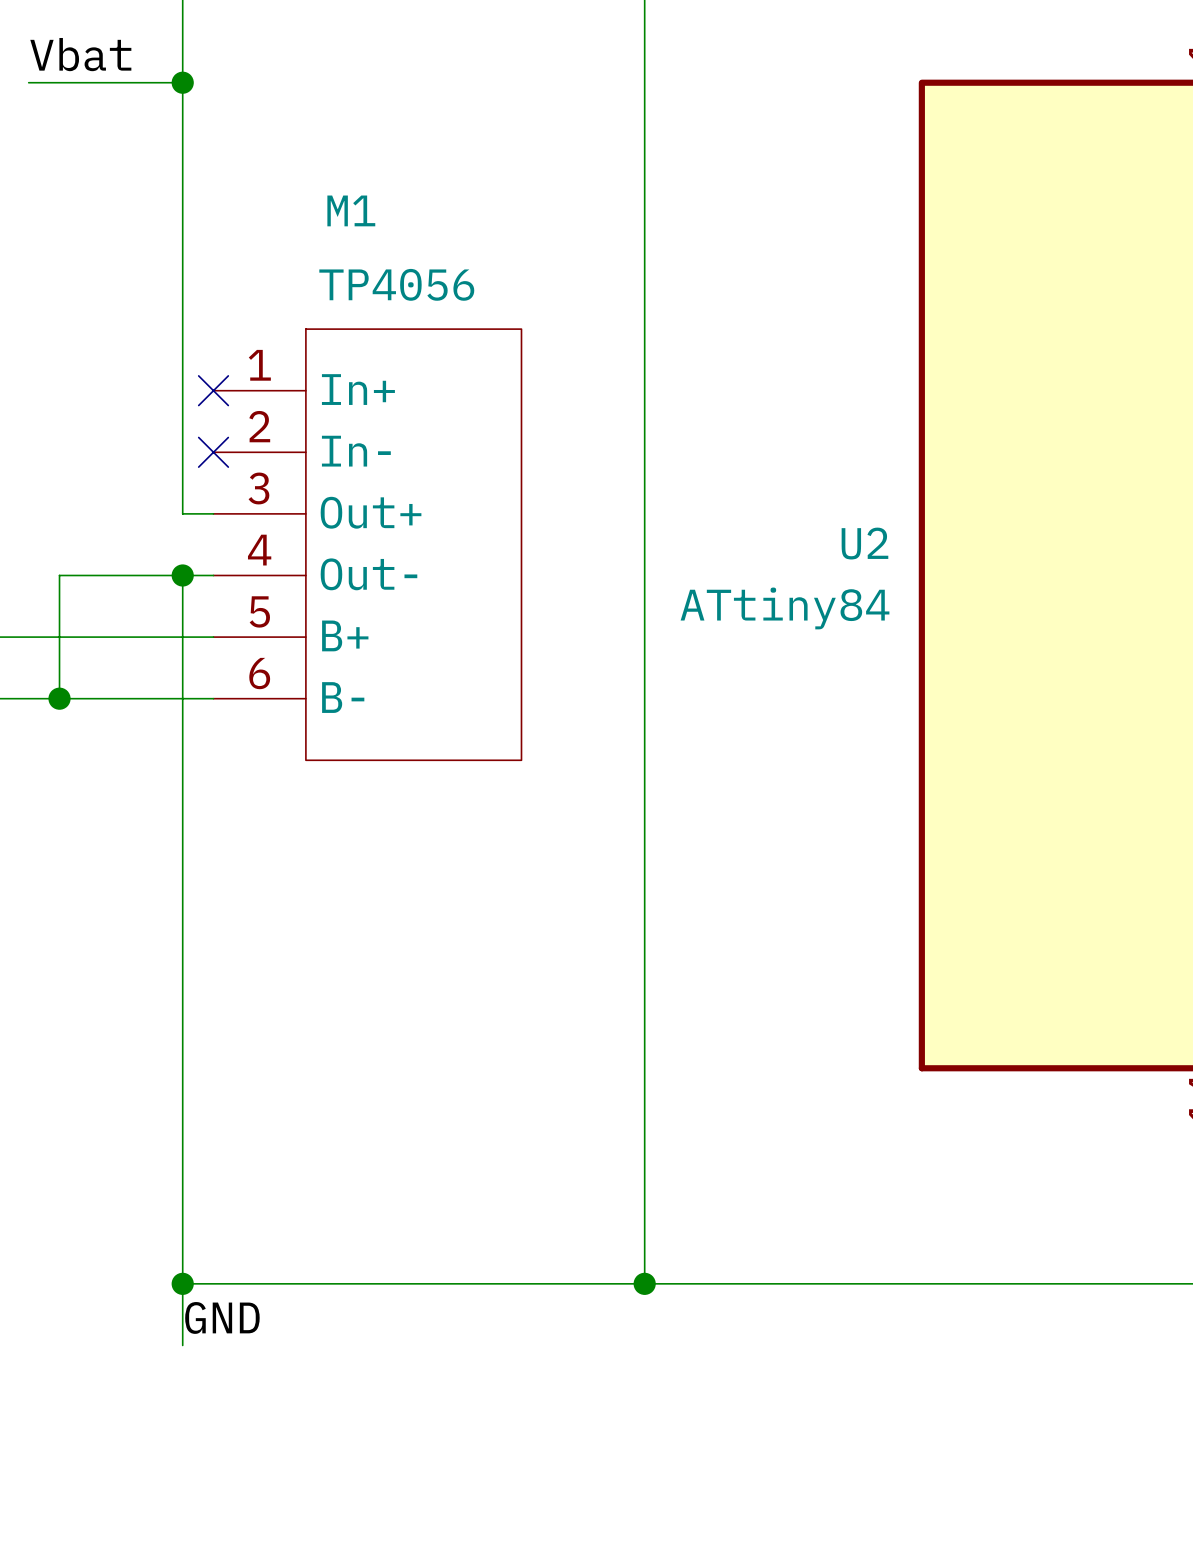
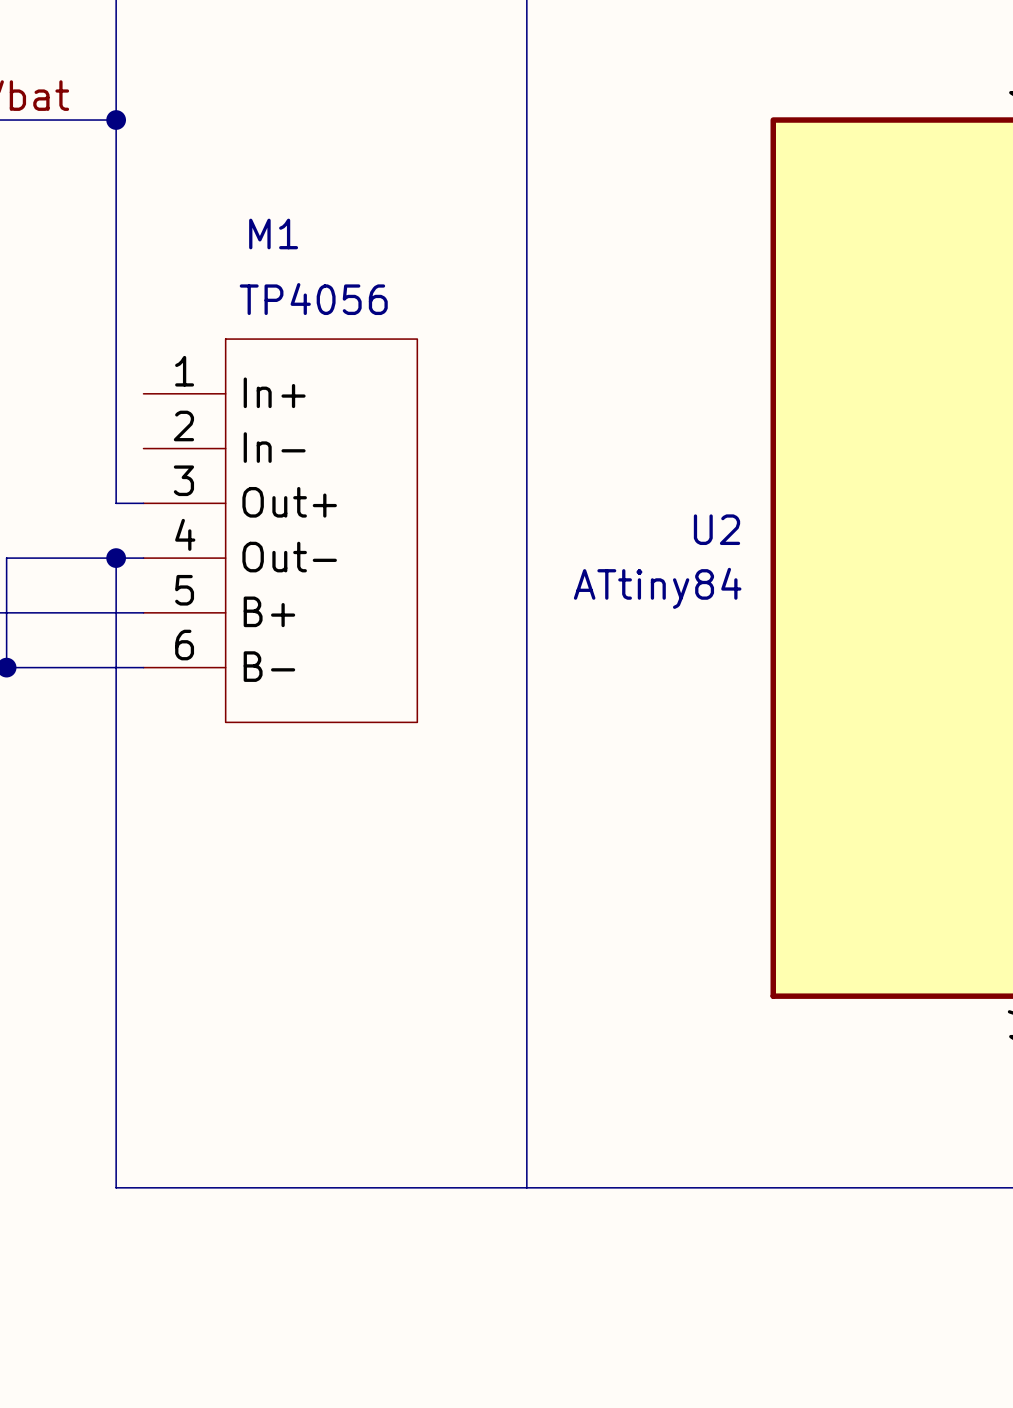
no-connect mark: (213, 390) -> none
no-connect mark: (213, 452) -> none
wire: (182, 1283) (182, 1345) -> none
junction: (182, 1283) -> none
junction: (644, 1283) -> none
label: GND (222, 1317) -> none

